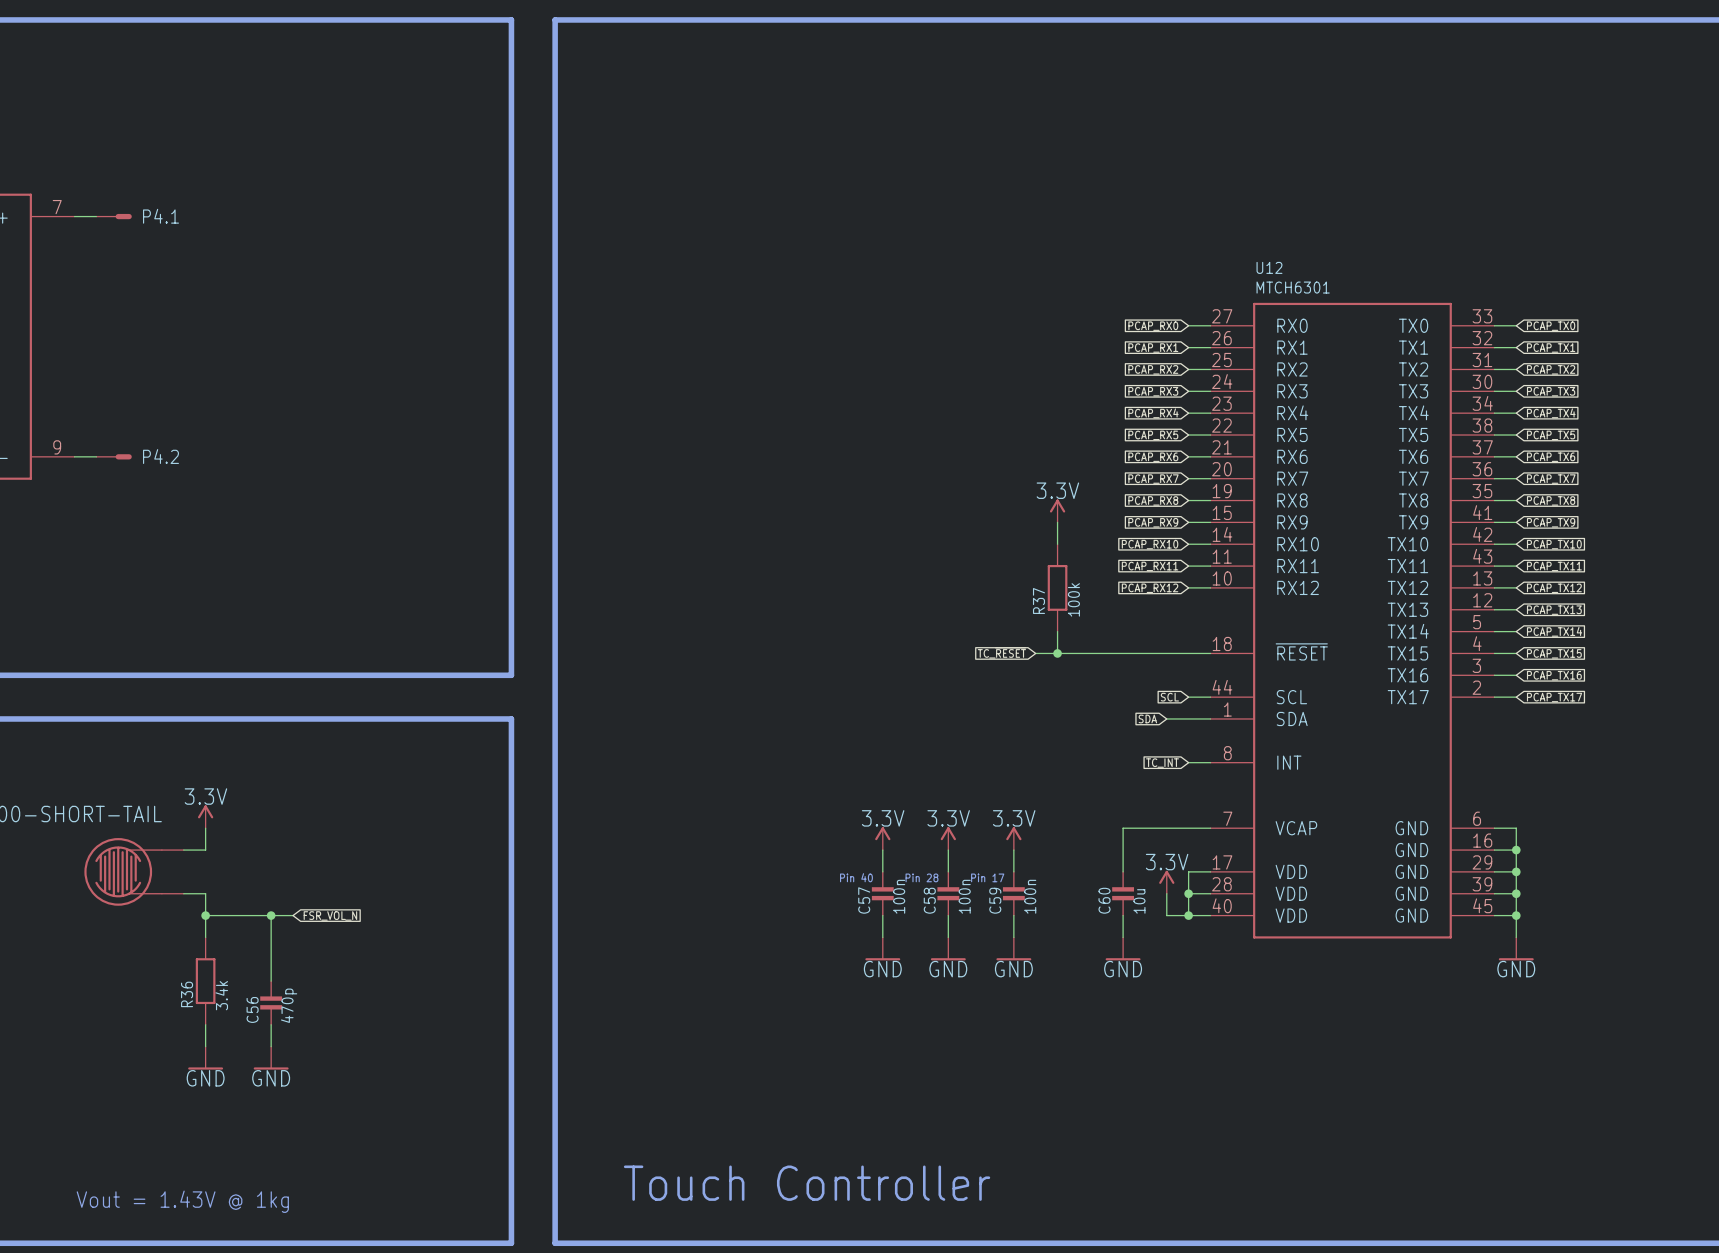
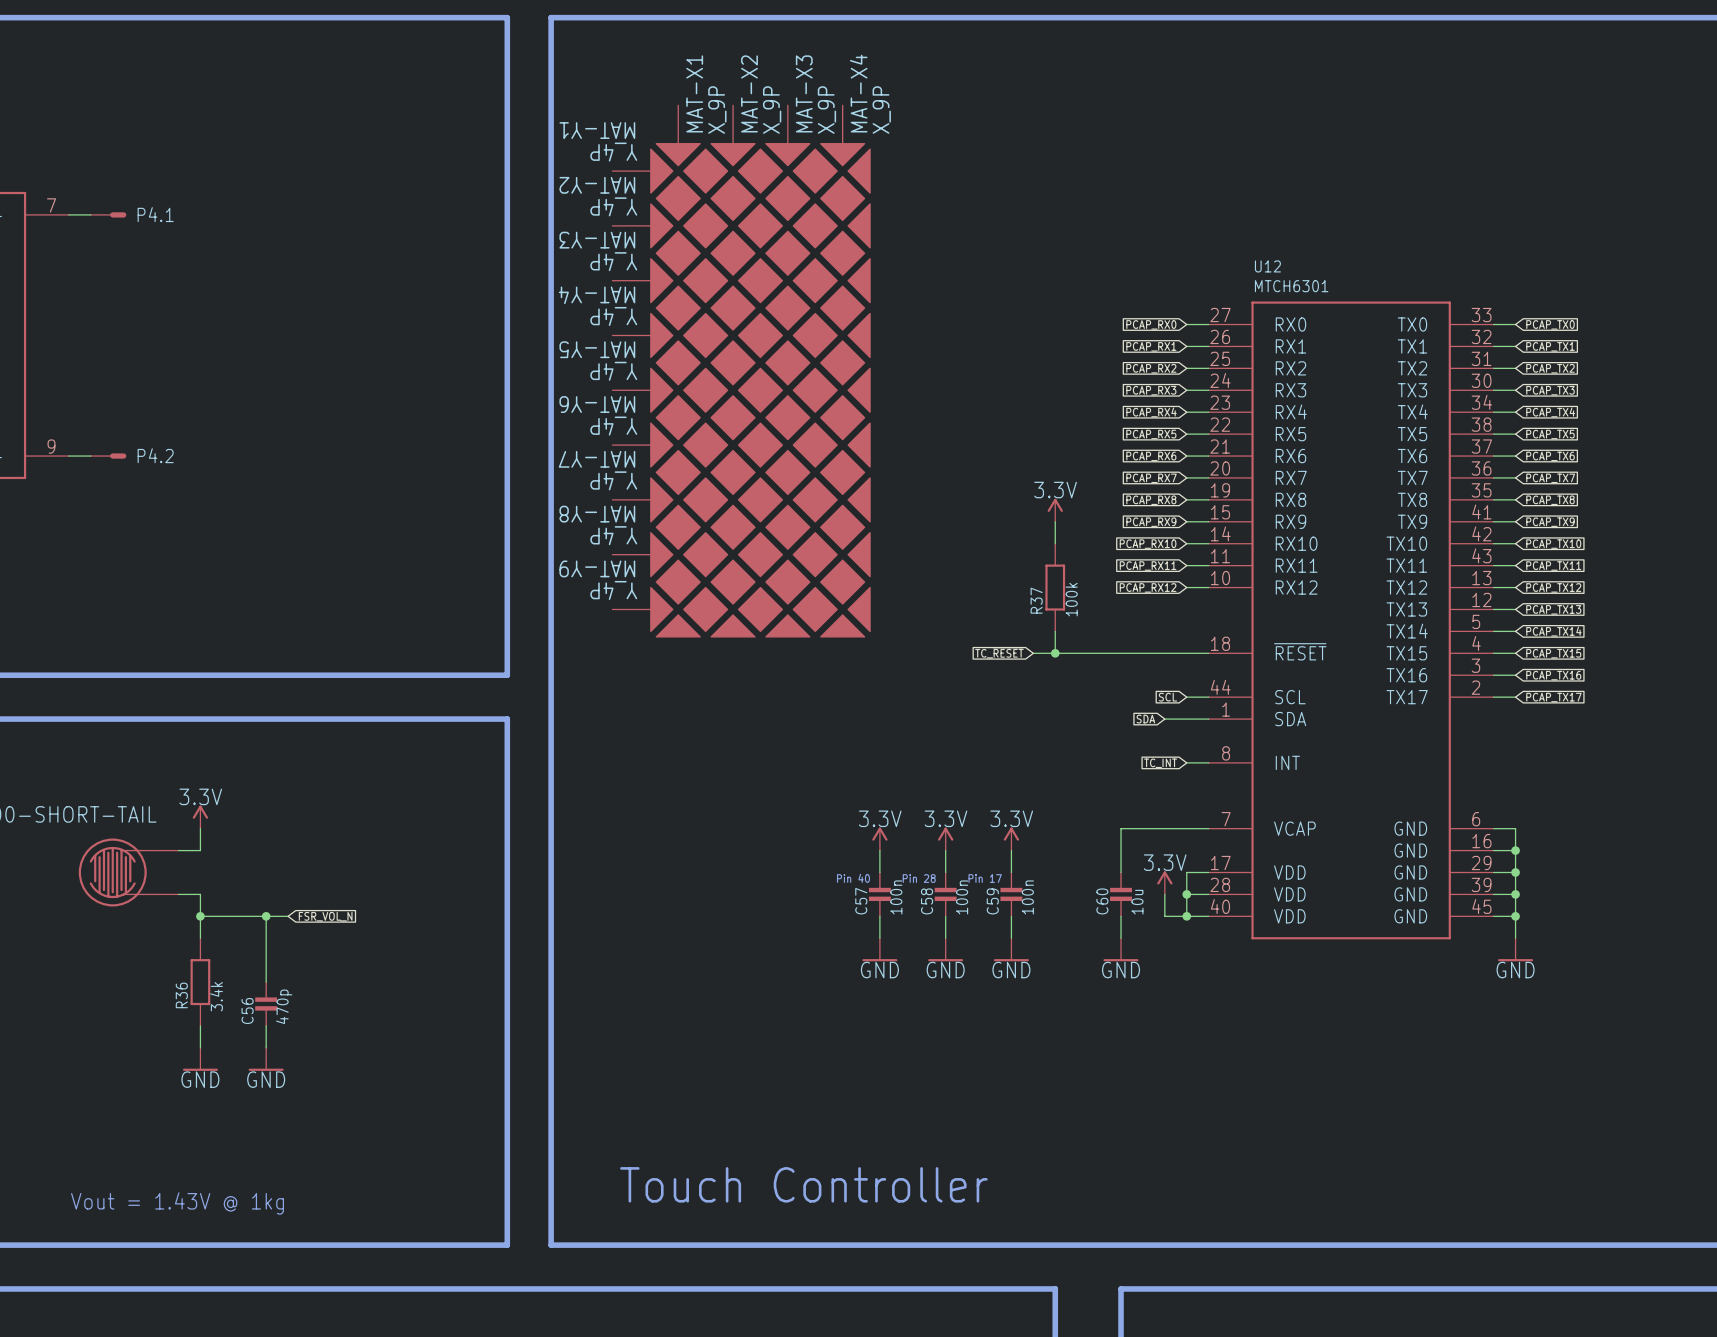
MAT-Y1: none -> Y_4P (741, 171)
MAT-Y2: none -> Y_4P (741, 225)
MAT-Y3: none -> Y_4P (741, 280)
MAT-Y4: none -> Y_4P (741, 335)
MAT-X1: none -> X_9P (678, 371)
MAT-X2: none -> X_9P (733, 371)
MAT-X3: none -> X_9P (787, 371)
MAT-X4: none -> X_9P (842, 371)
MAT-Y5: none -> Y_4P (741, 390)
MAT-Y6: none -> Y_4P (741, 445)
MAT-Y7: none -> Y_4P (741, 499)
MAT-Y8: none -> Y_4P (741, 554)
MAT-Y9: none -> Y_4P (741, 609)

